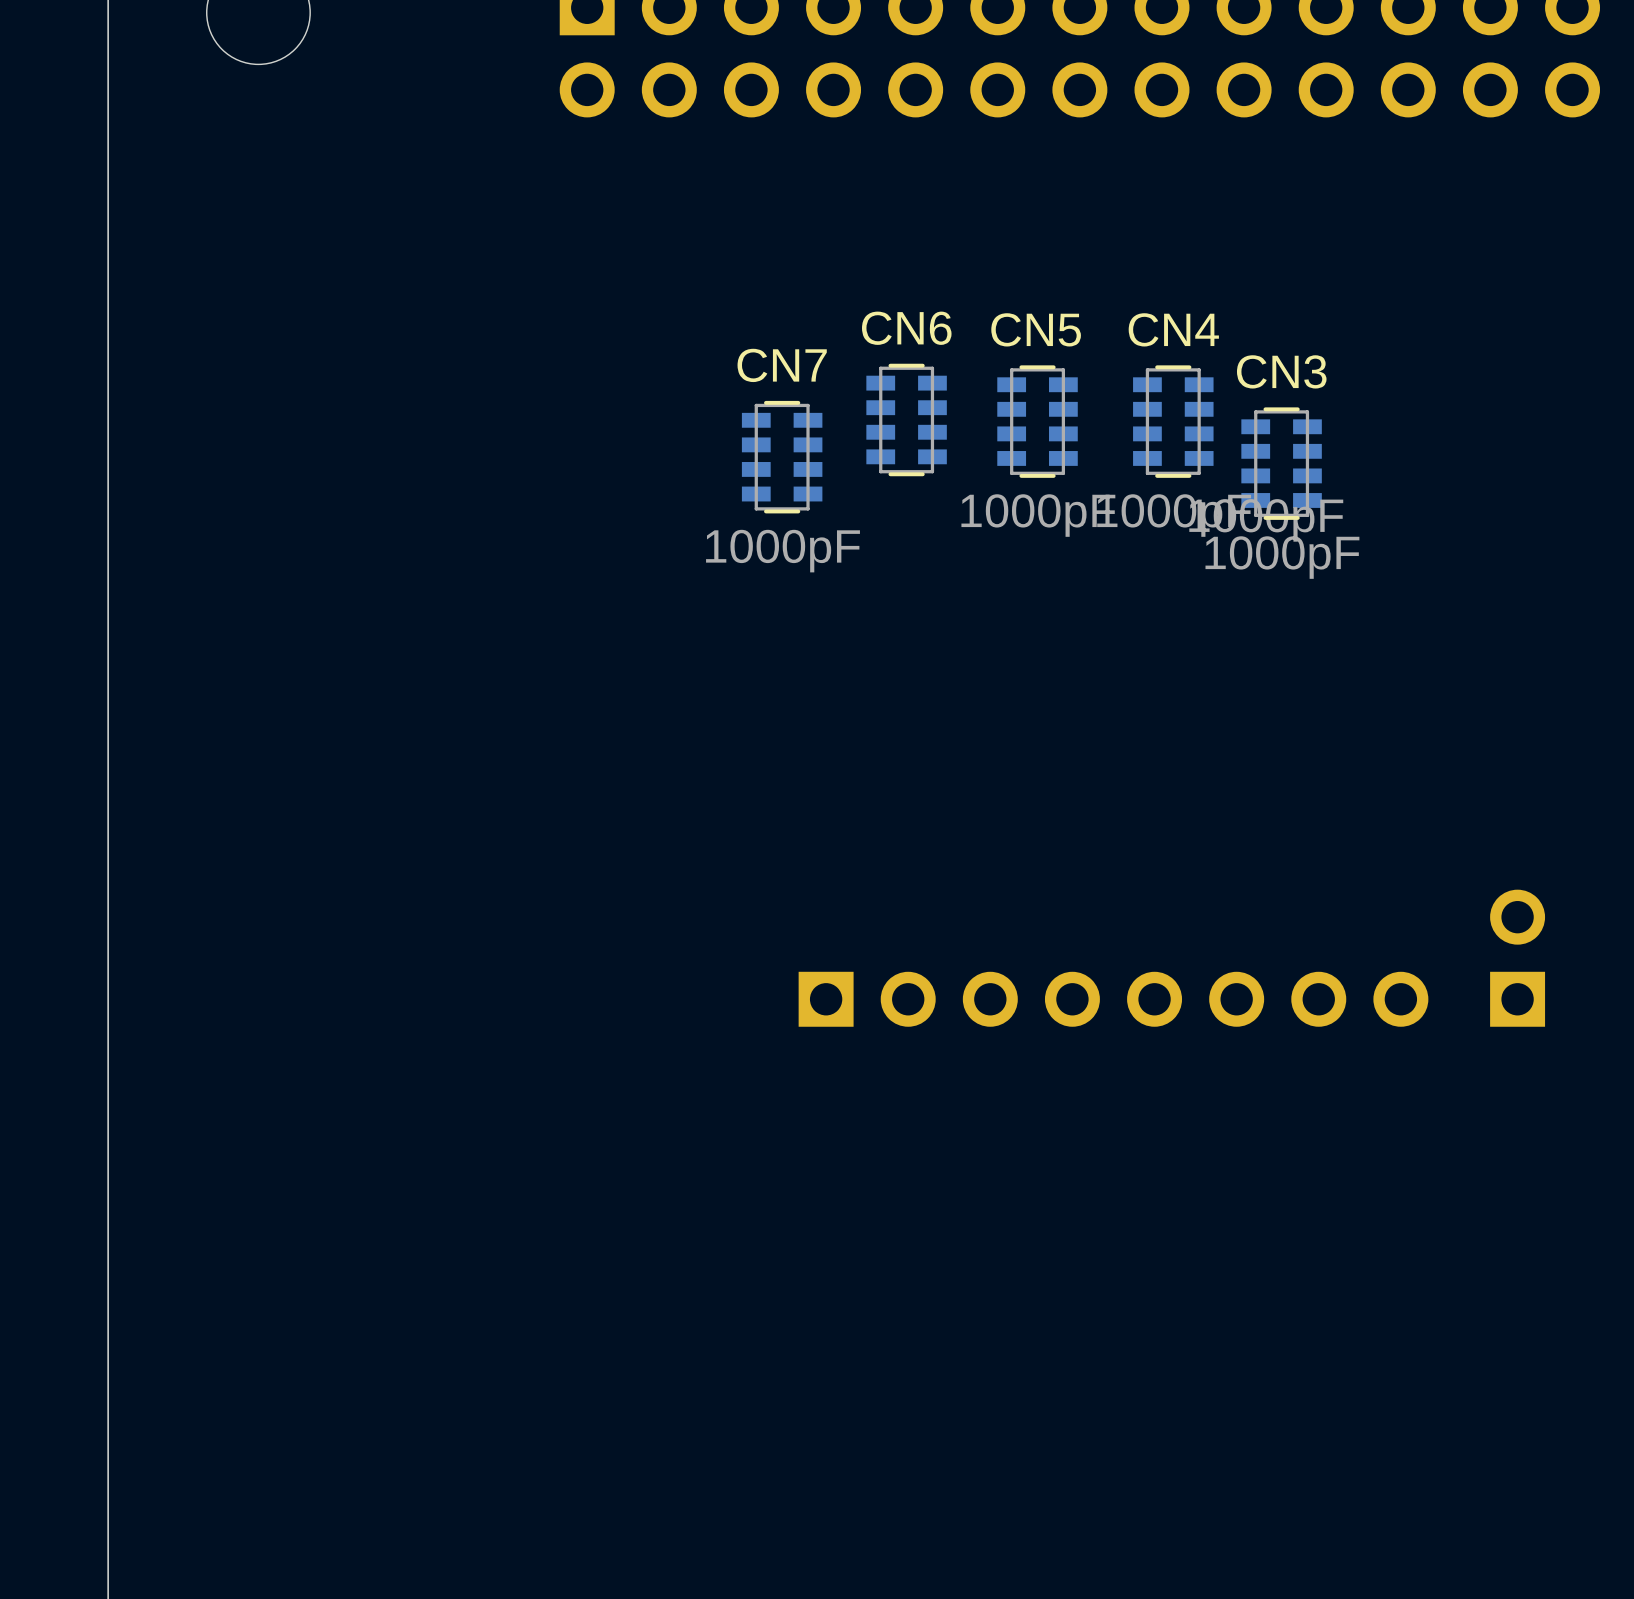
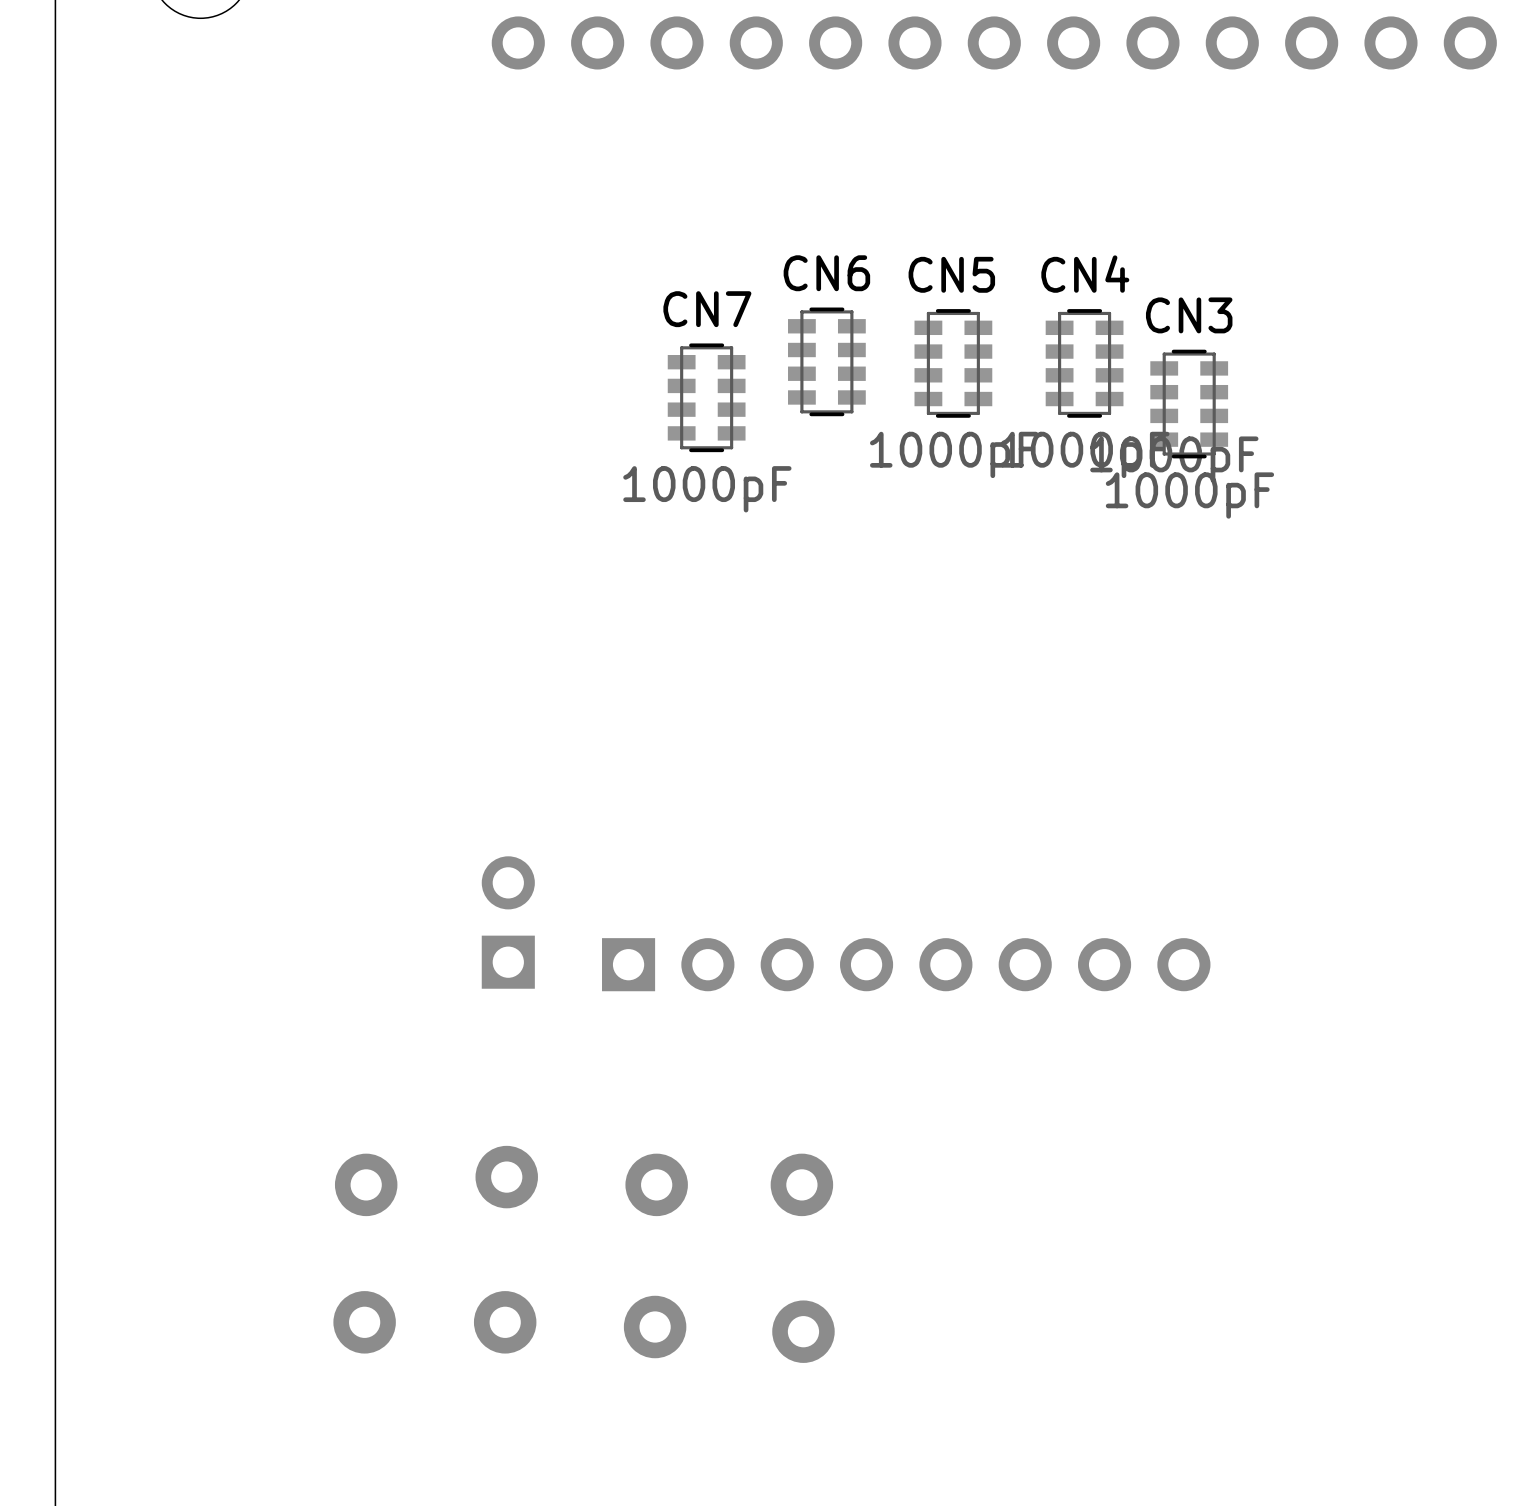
part: (1517, 958) -> none
part position: (1113, 999) -> (906, 964)
part: none -> (508, 922)
part: none -> (506, 1177)
part: none -> (366, 1184)
part: none -> (656, 1184)
part: none -> (801, 1184)
part: none -> (364, 1322)
part: none -> (505, 1322)
part: none -> (655, 1327)
part: none -> (803, 1331)

